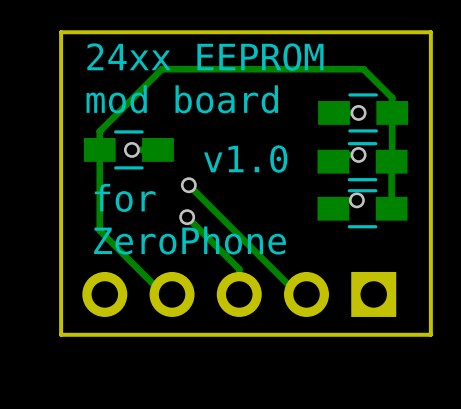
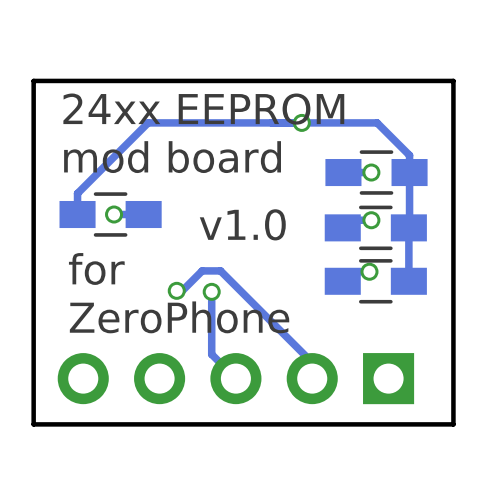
via: none -> (301, 122)
track: (99, 149) (99, 230) (172, 302) -> none
track: (188, 185) (306, 302) -> none
via position: (188, 185) -> (211, 291)
track: none -> (182, 290) (202, 270) (220, 270) (312, 362) (312, 378)
track: (187, 217) (239, 269) (239, 302) -> none
track: none -> (211, 291) (211, 354) (235, 378)

